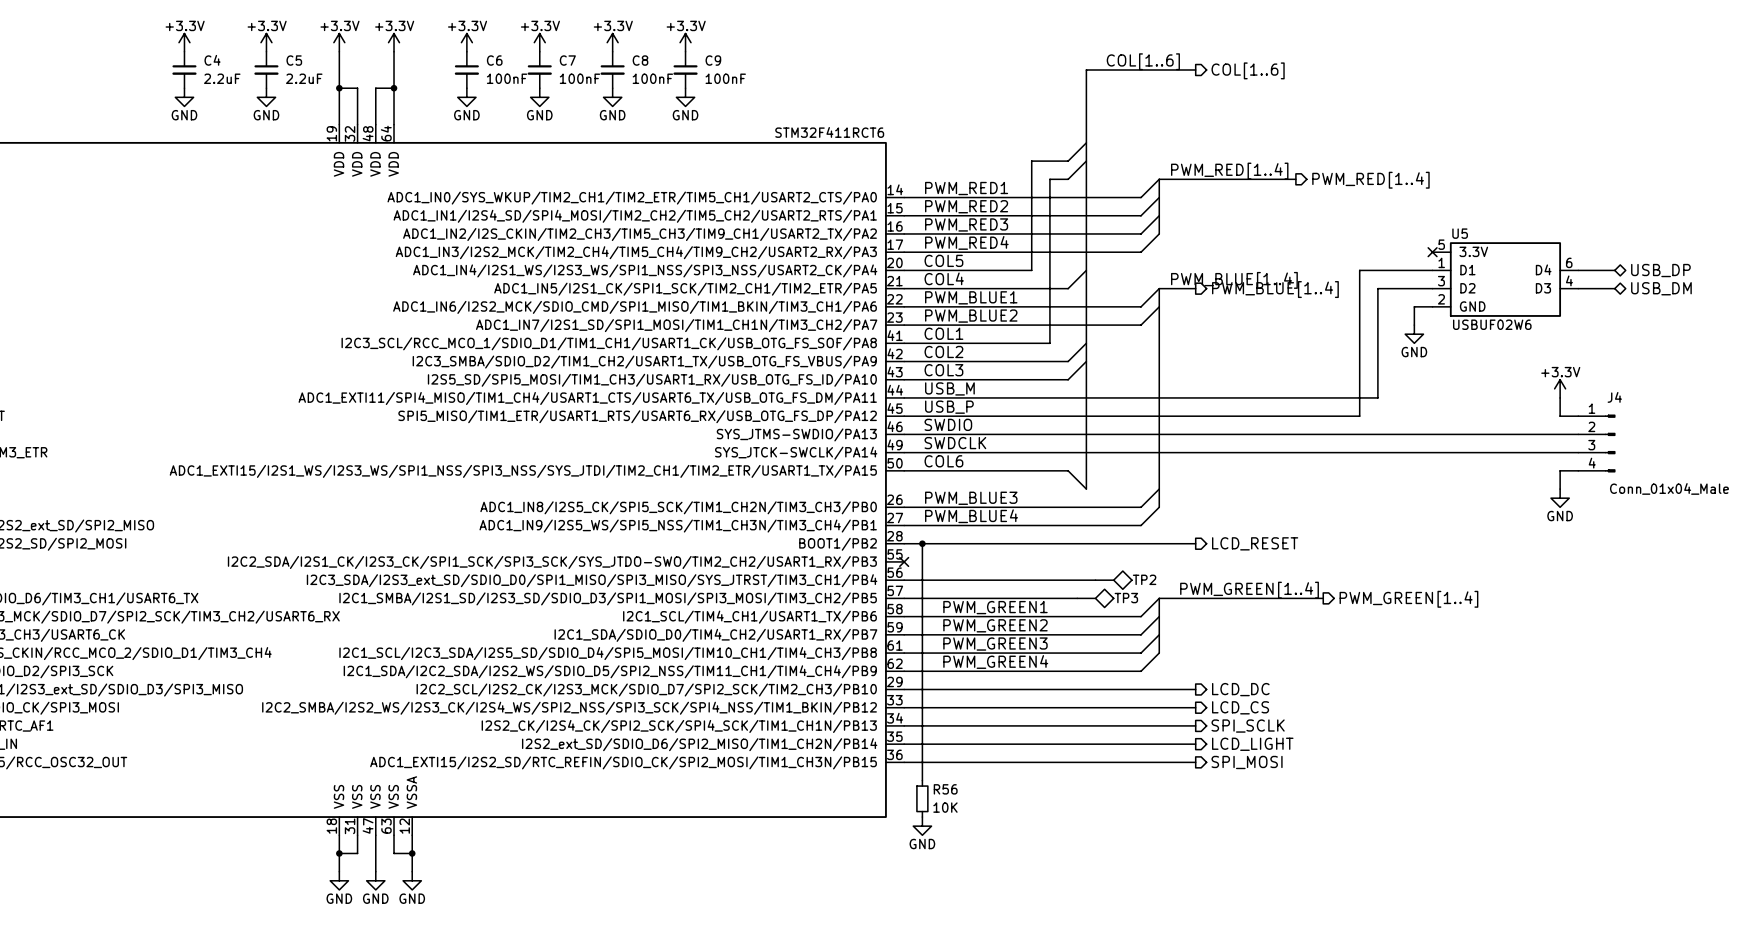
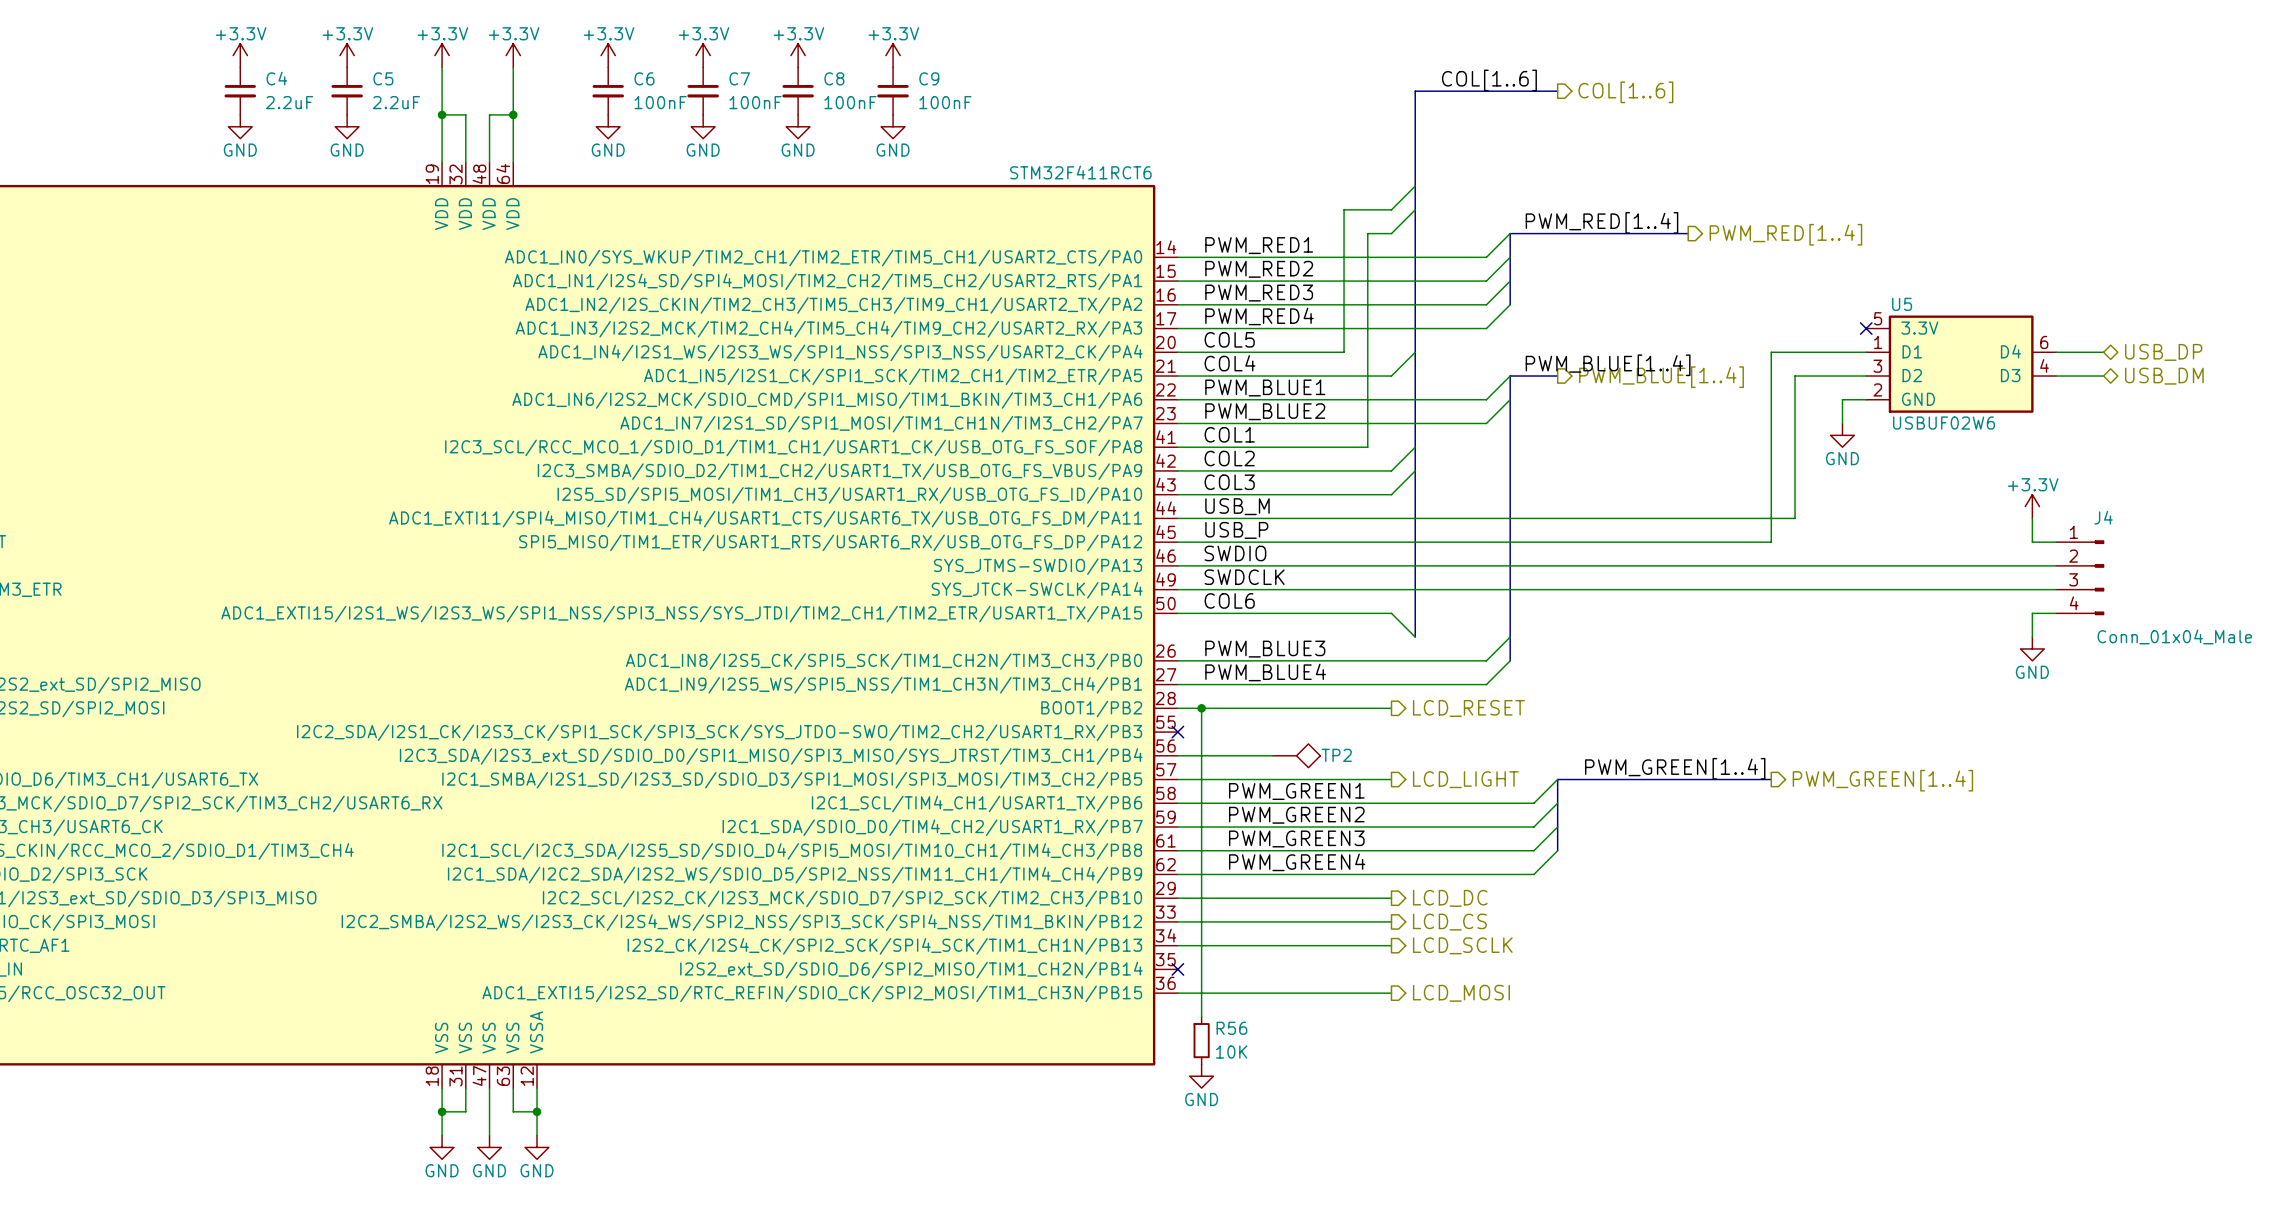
wire: (1068, 543) (1195, 543) -> none
hierarchical label position: LCD_RESET (1255, 543) -> LCD_RESET (1468, 708)
wire: (977, 580) (1095, 580) -> none
TP2 position: (1113, 580) -> (1296, 755)
label position: PWM_GREEN[1..4] (1249, 590) -> PWM_GREEN[1..4] (1675, 768)
wire: (1068, 598) (1077, 598) -> none
TP3: (1095, 598) -> none
hierarchical label: none -> LCD_LIGHT (1465, 779)
wire: (1159, 598) (1141, 616) -> (1557, 779) (1533, 803) (1486, 803)
bus: (1195, 598) (1159, 598) (1159, 653) -> (1557, 779) (1557, 850)
bus: none -> (1723, 779) (1771, 779)
hierarchical label position: PWM_GREEN[1..4] (1408, 599) -> PWM_GREEN[1..4] (1882, 780)
wire: (1159, 616) (1141, 634) -> (1557, 803) (1533, 826) (1486, 826)
wire: (1159, 634) (1141, 653) -> (1557, 826) (1533, 850) (1486, 850)
wire: (1159, 653) (1141, 671) -> (1557, 850) (1533, 874) (1486, 874)
wire: (1068, 689) (1195, 689) -> none
hierarchical label position: LCD_DC (1240, 689) -> LCD_DC (1450, 898)
wire: (1068, 707) (1195, 707) -> none
hierarchical label position: LCD_CS (1240, 707) -> LCD_CS (1449, 922)
wire: (1068, 725) (1195, 725) -> none
hierarchical label: none -> LCD_SCLK (1462, 945)
hierarchical label: SPI_SCLK (1248, 726) -> none
wire: (904, 744) (1195, 744) -> none
no-connect mark: none -> (1177, 969)
hierarchical label: LCD_LIGHT (1252, 744) -> none
wire: (1068, 762) (1195, 762) -> none
hierarchical label: none -> LCD_MOSI (1461, 993)
hierarchical label: SPI_MOSI (1247, 762) -> none

